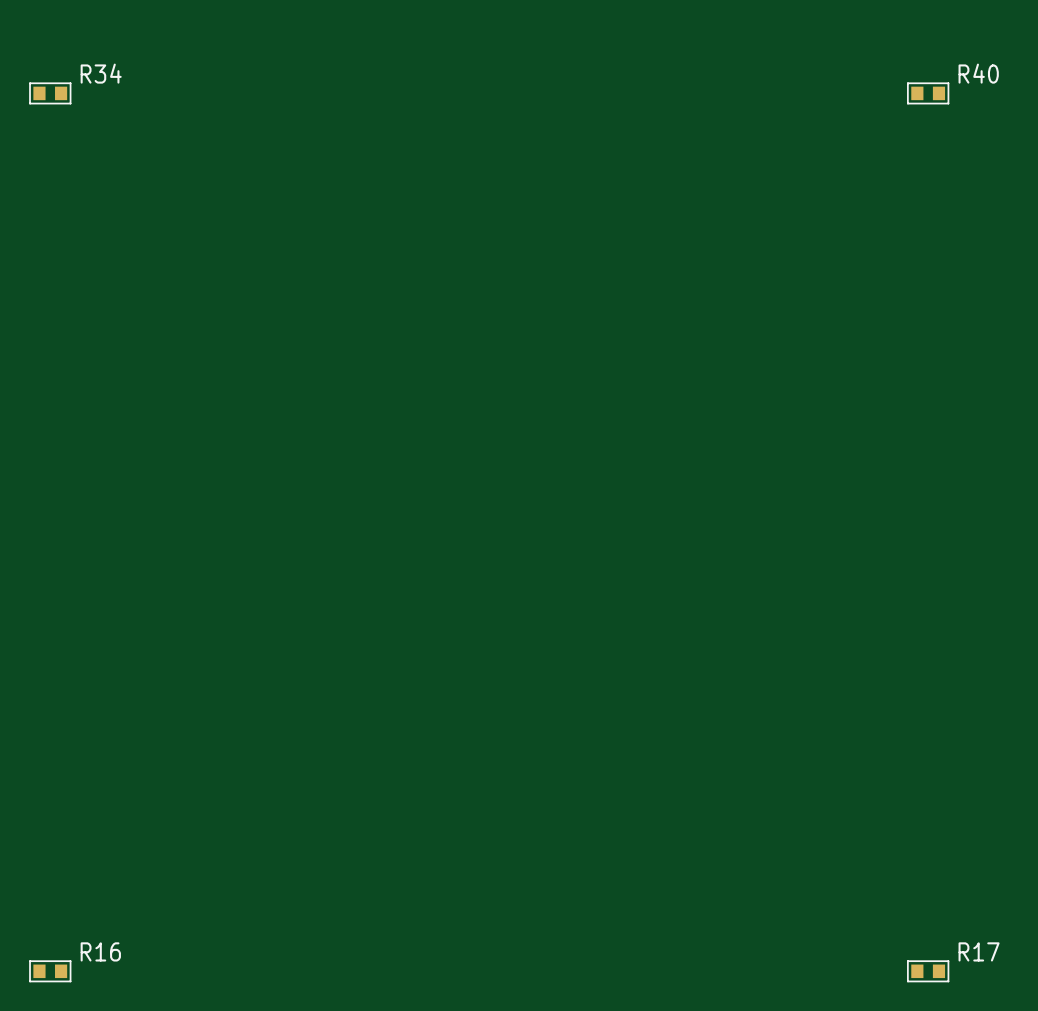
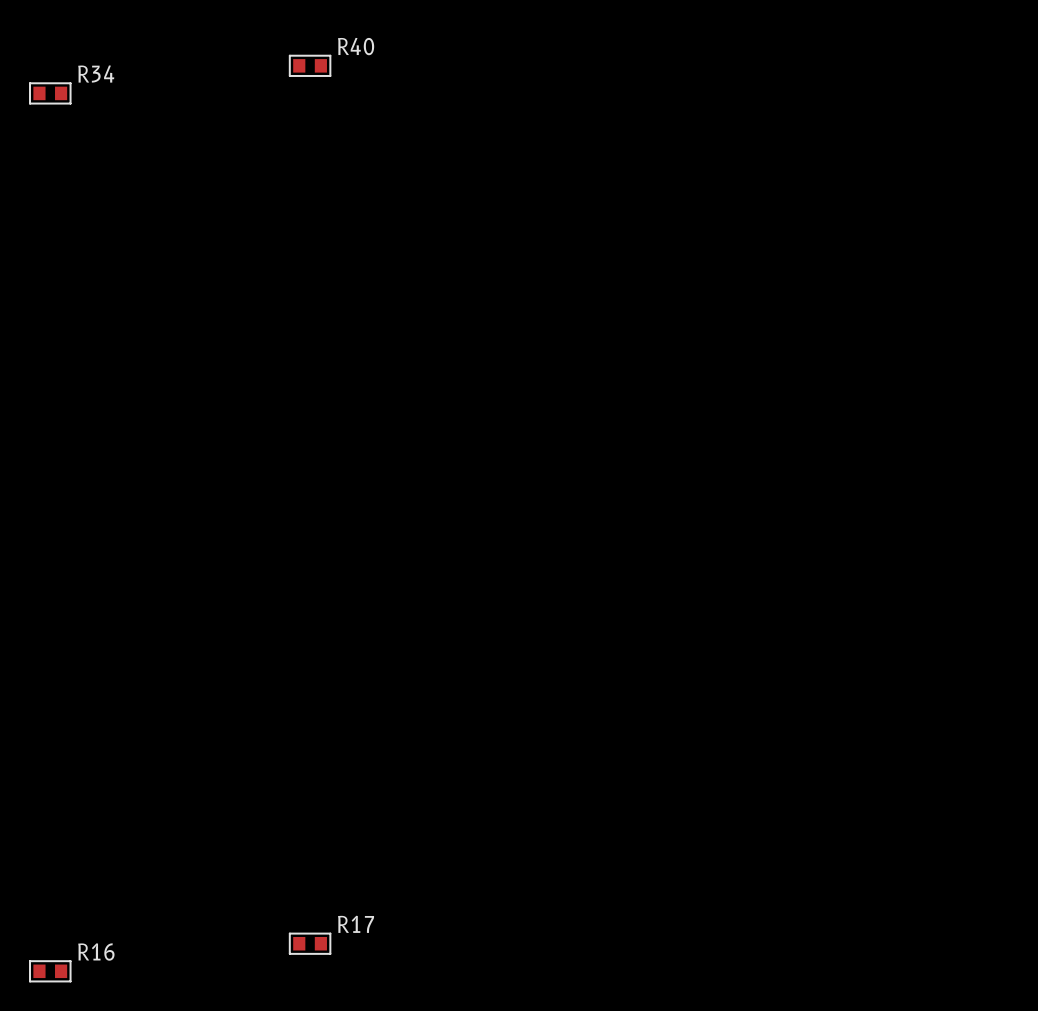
R40 position: (928, 93) -> (310, 65)
R17 position: (928, 971) -> (310, 943)

